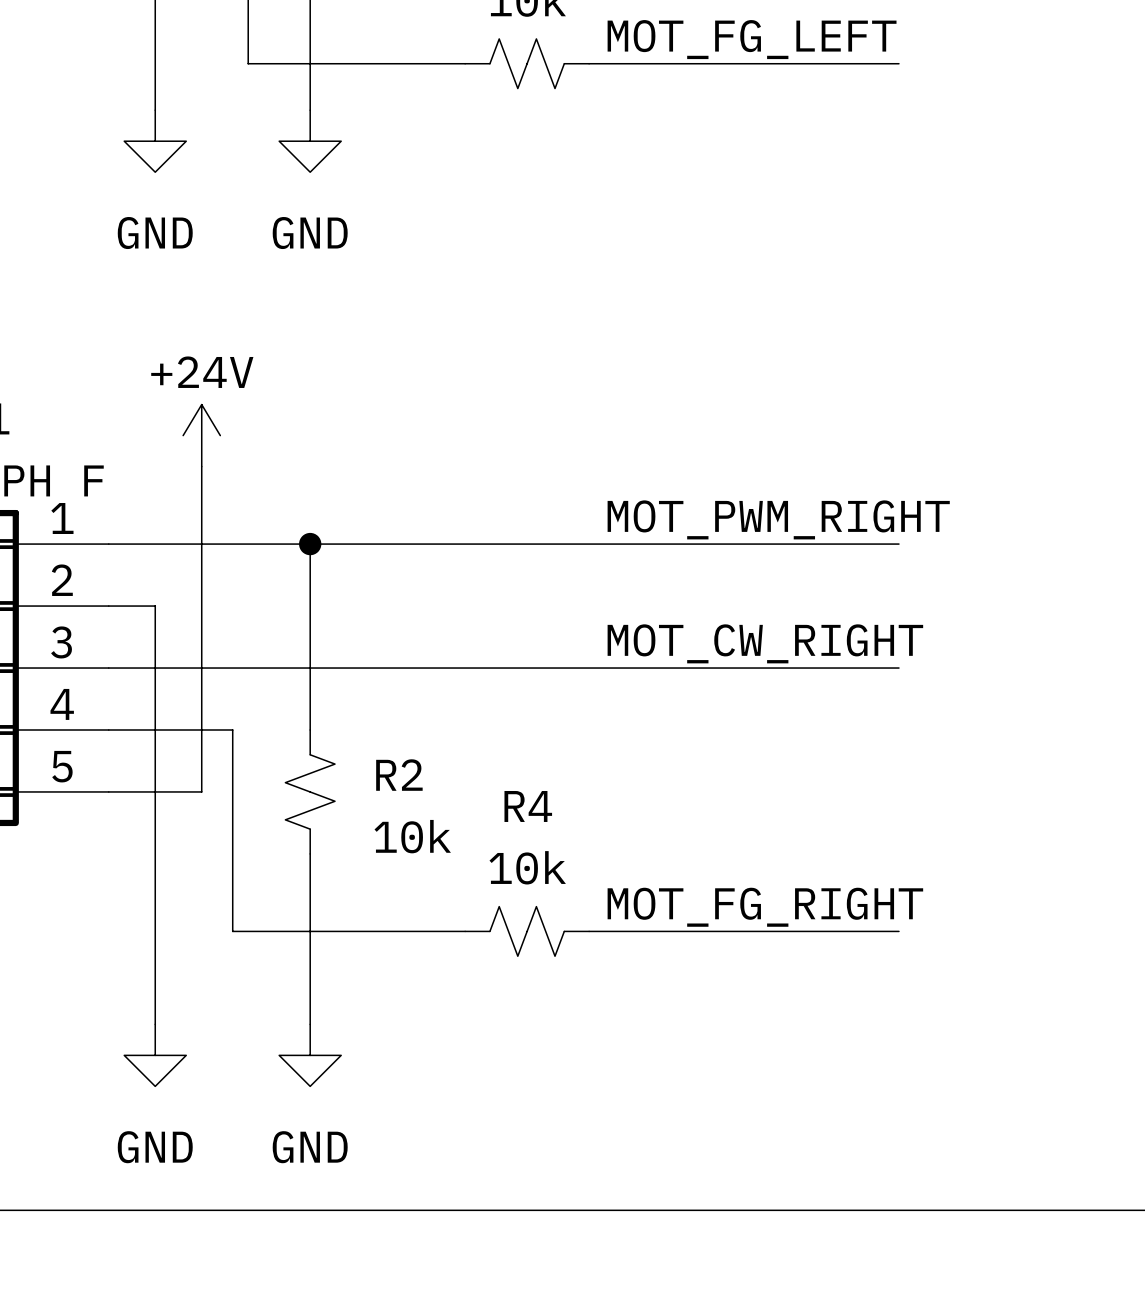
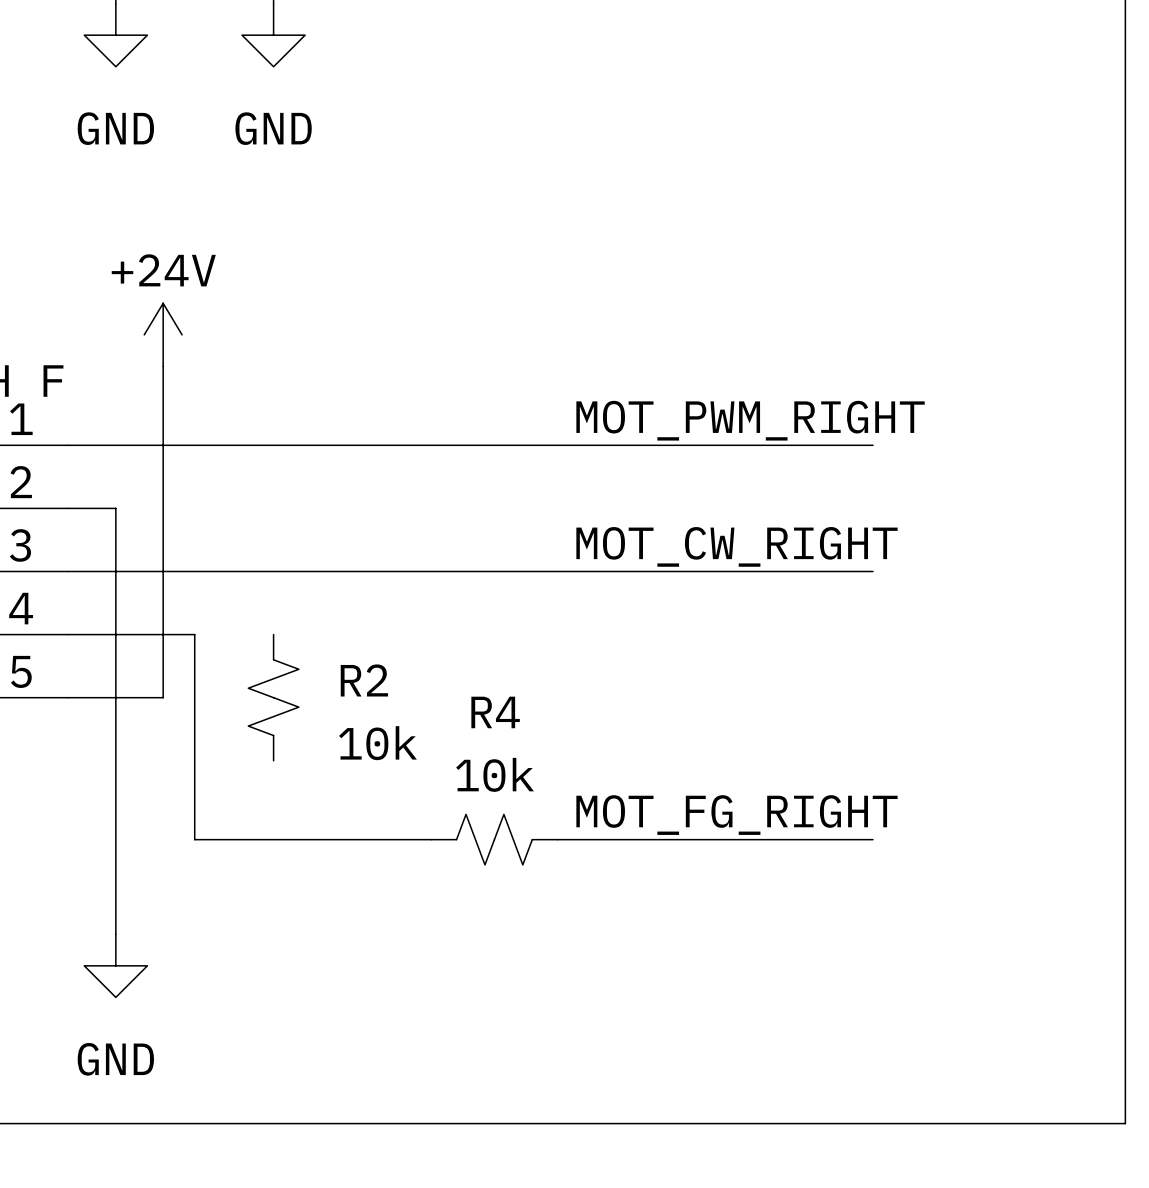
wire: (310, 544) (310, 729) -> none
junction: (310, 544) -> none
wire: (310, 853) (310, 1024) -> none
power symbol: GND (310, 1055) -> none

